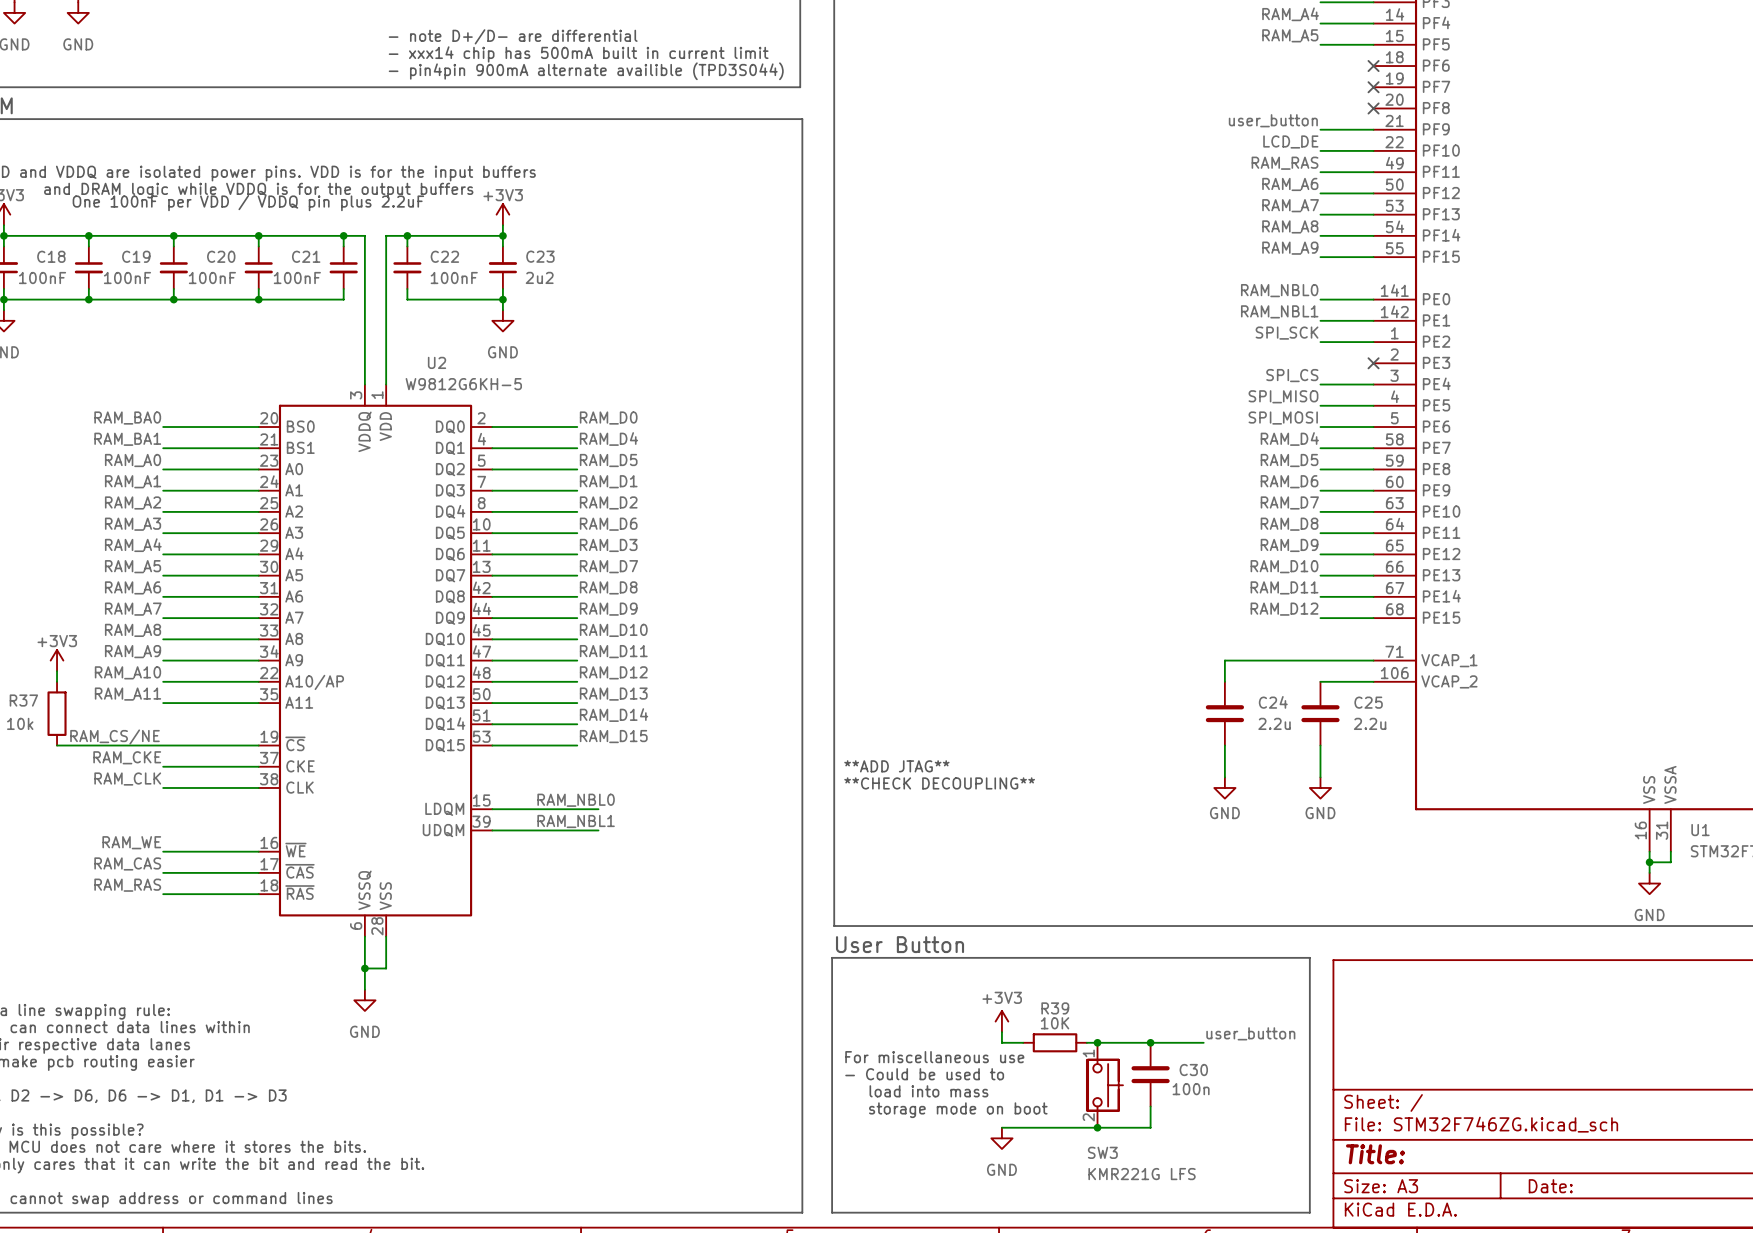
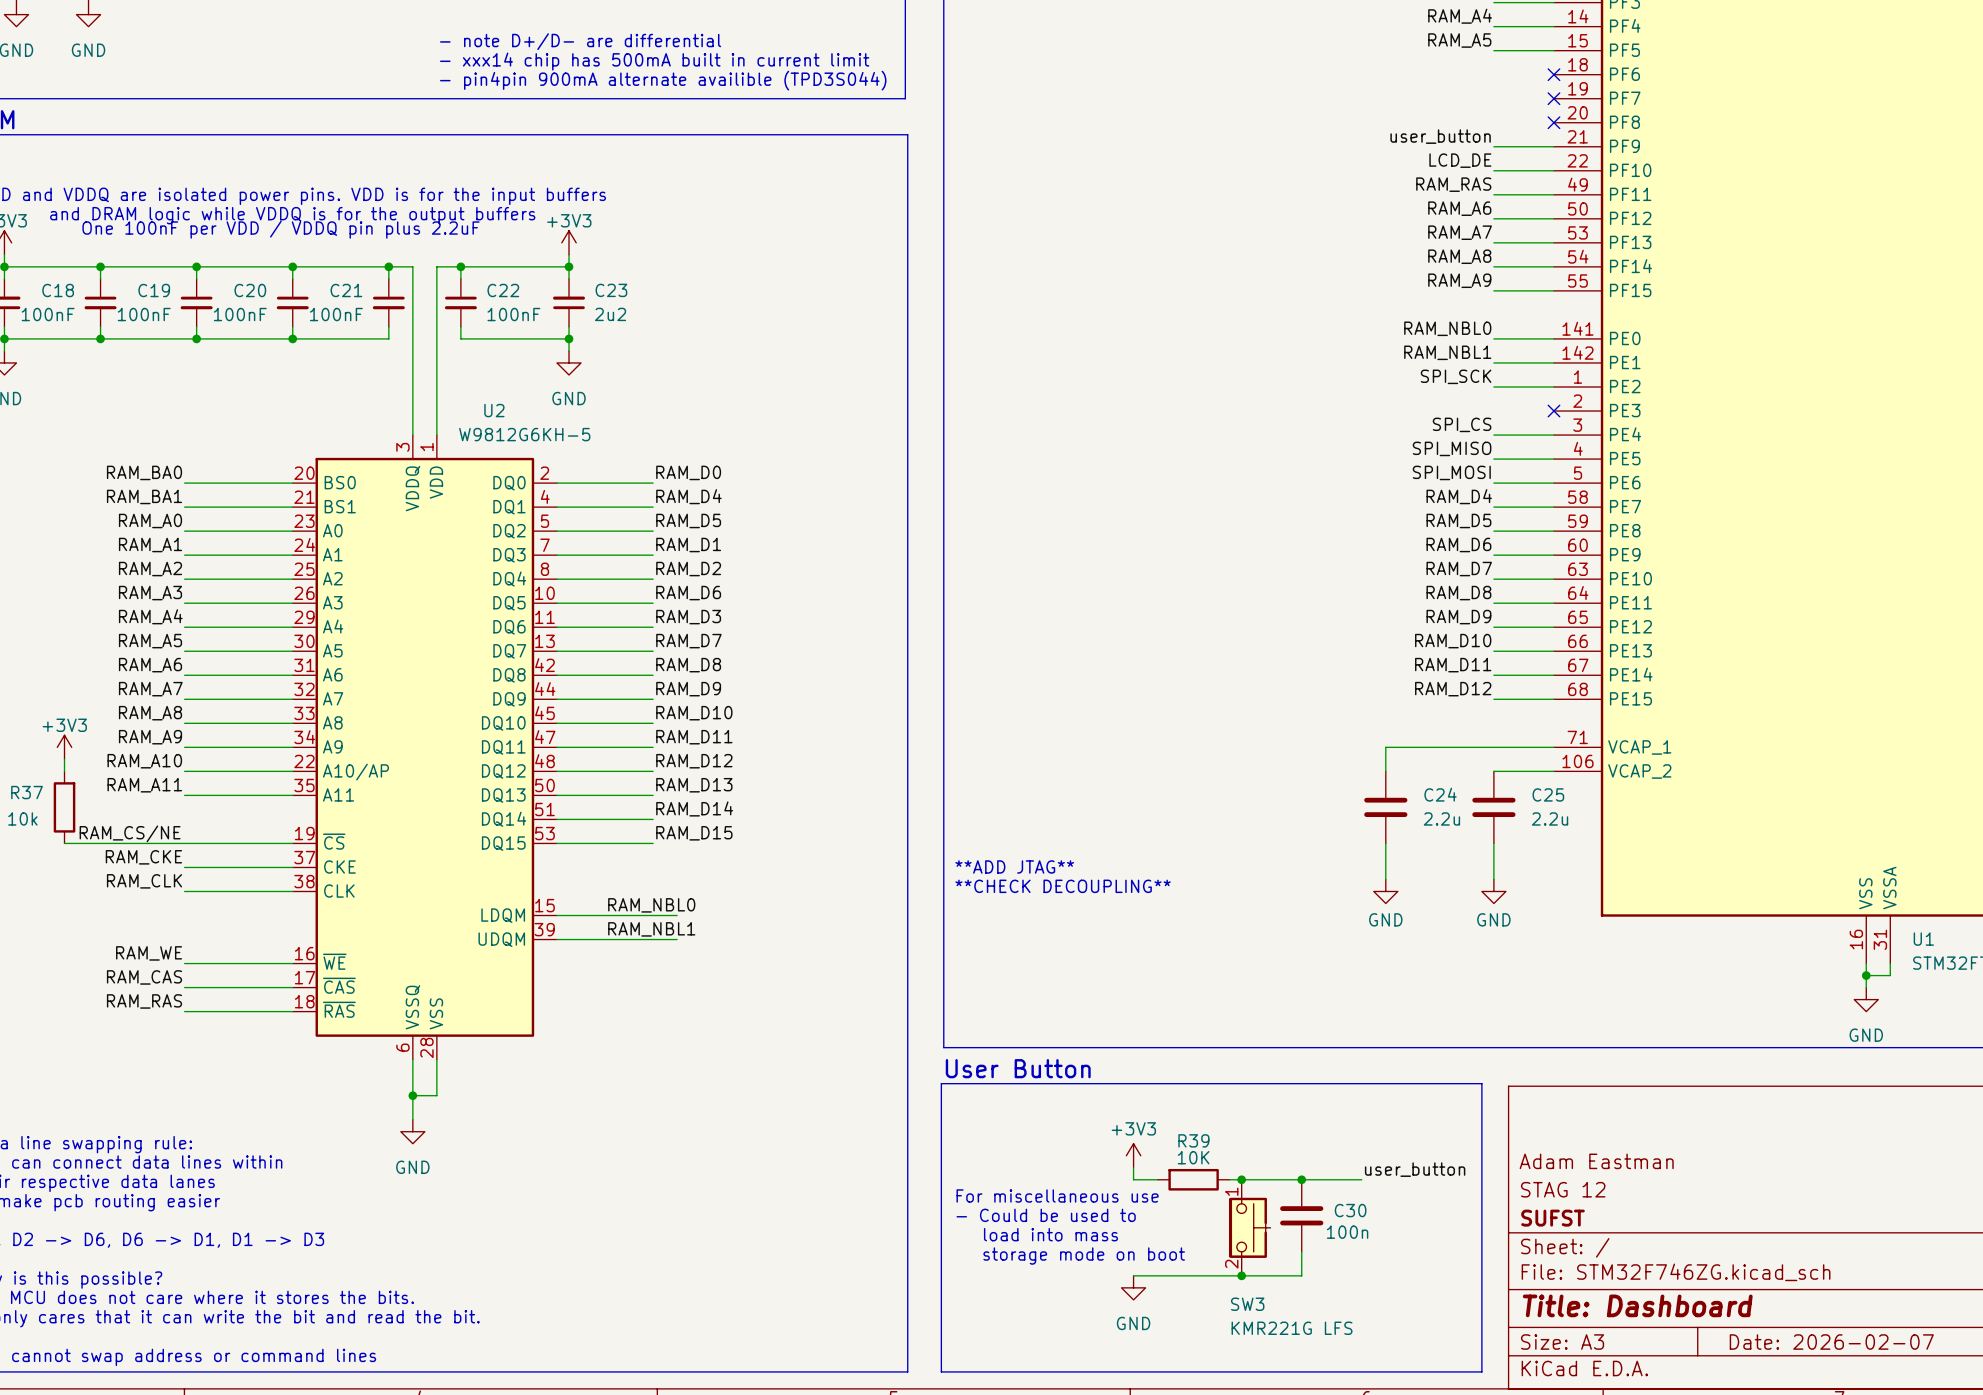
title block: none -> Adam Eastman (1596, 1161)
title block: none -> STAG 12 (1563, 1189)
title block: none -> SUFST (1553, 1218)
title block: Title: (1375, 1154) -> Title: Dashboard (1637, 1305)
title block: Date: (1550, 1186) -> Date: 2026-02-07 (1831, 1342)

